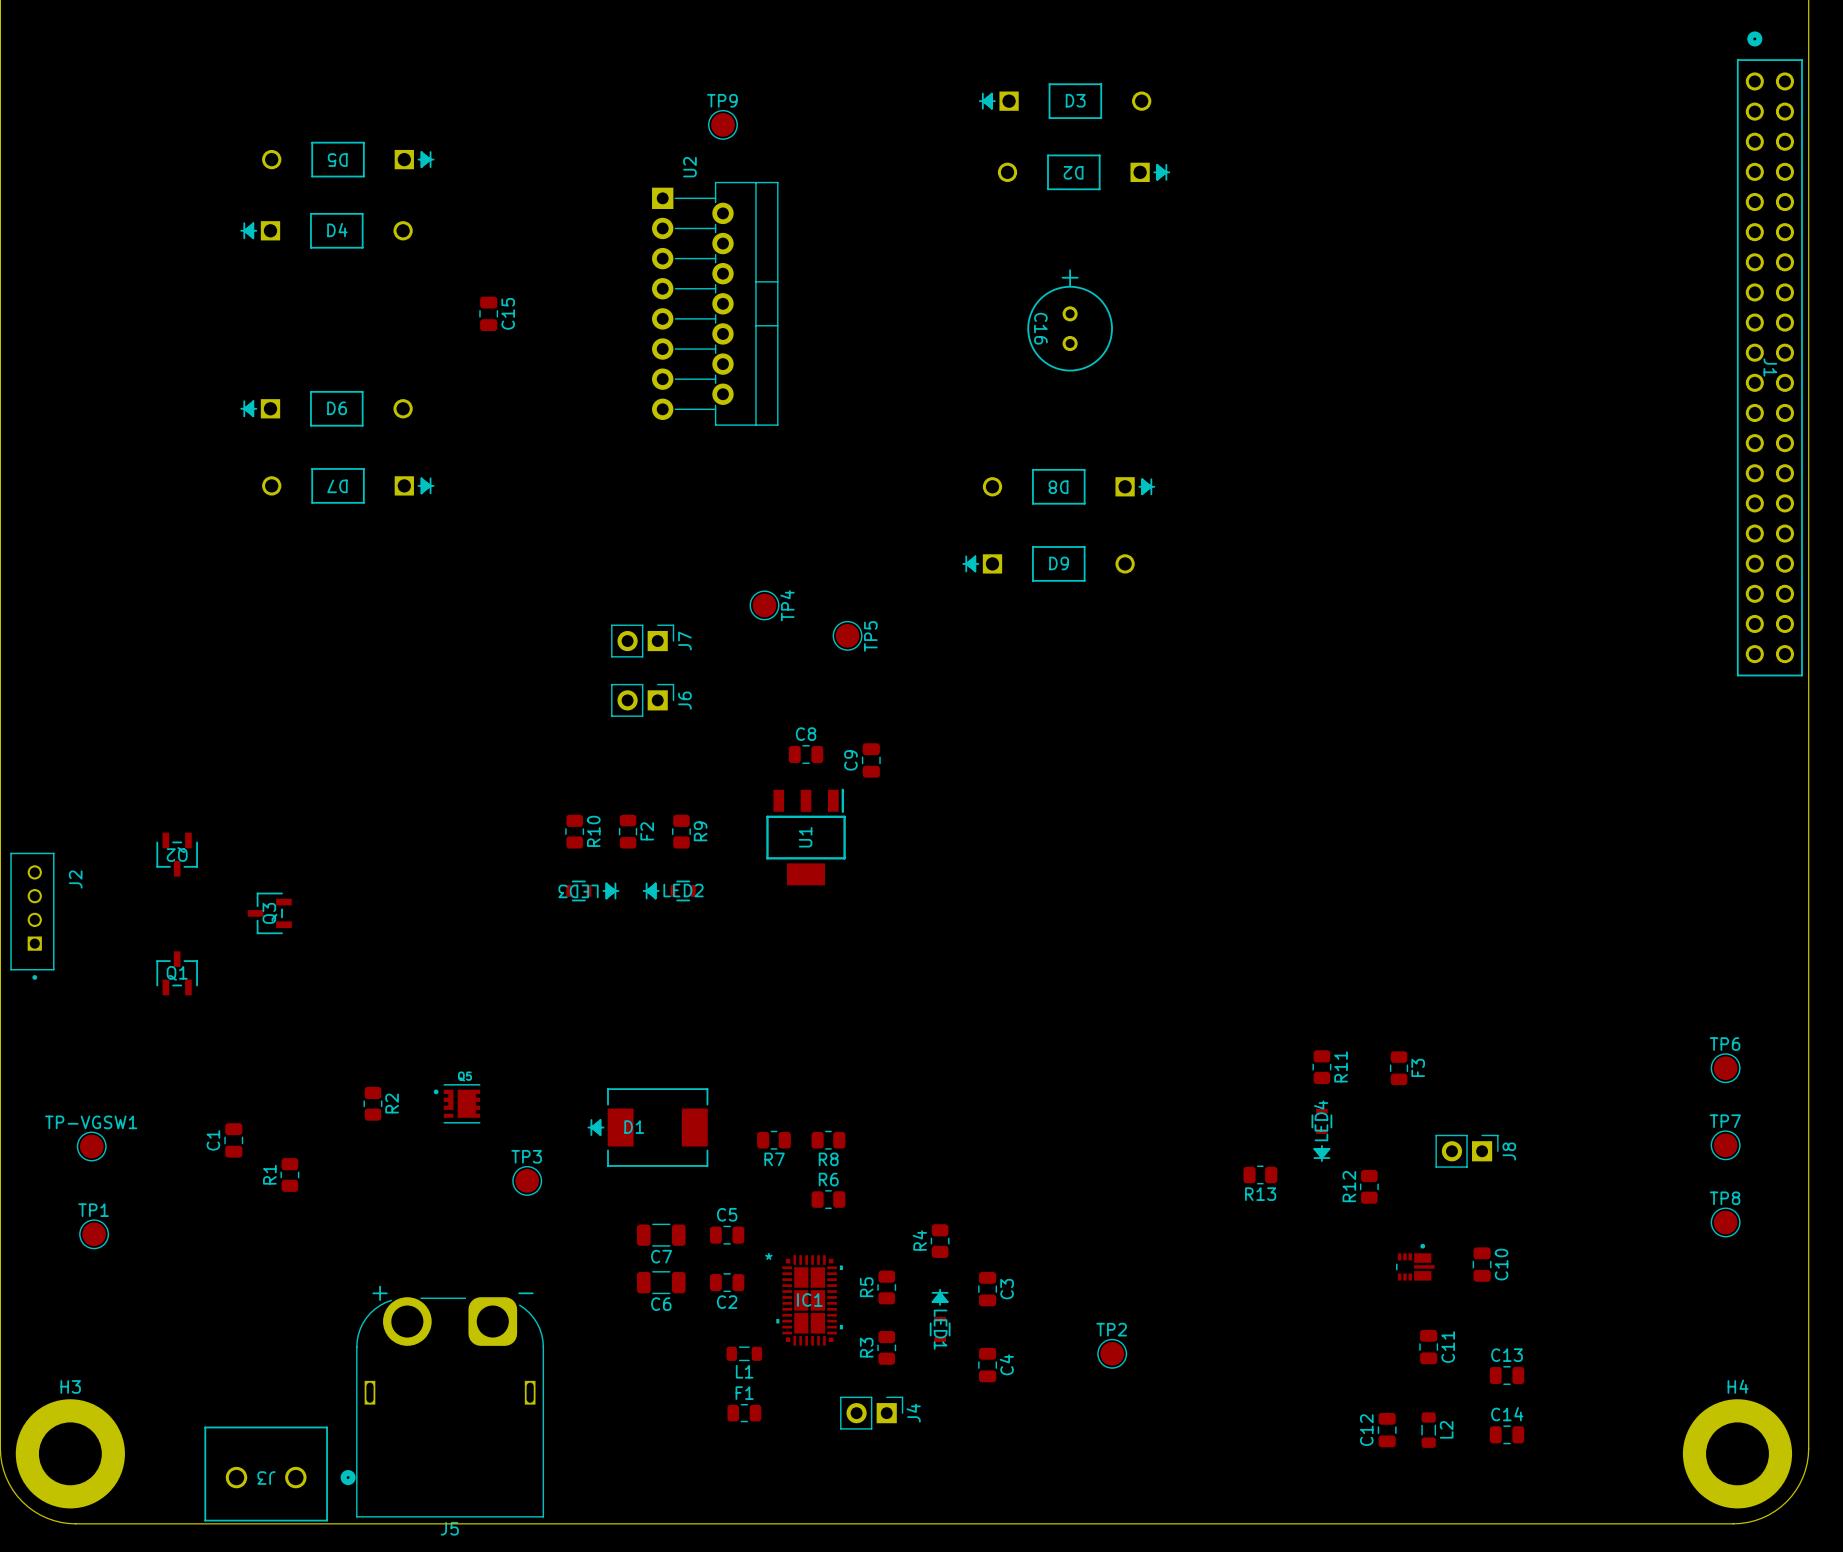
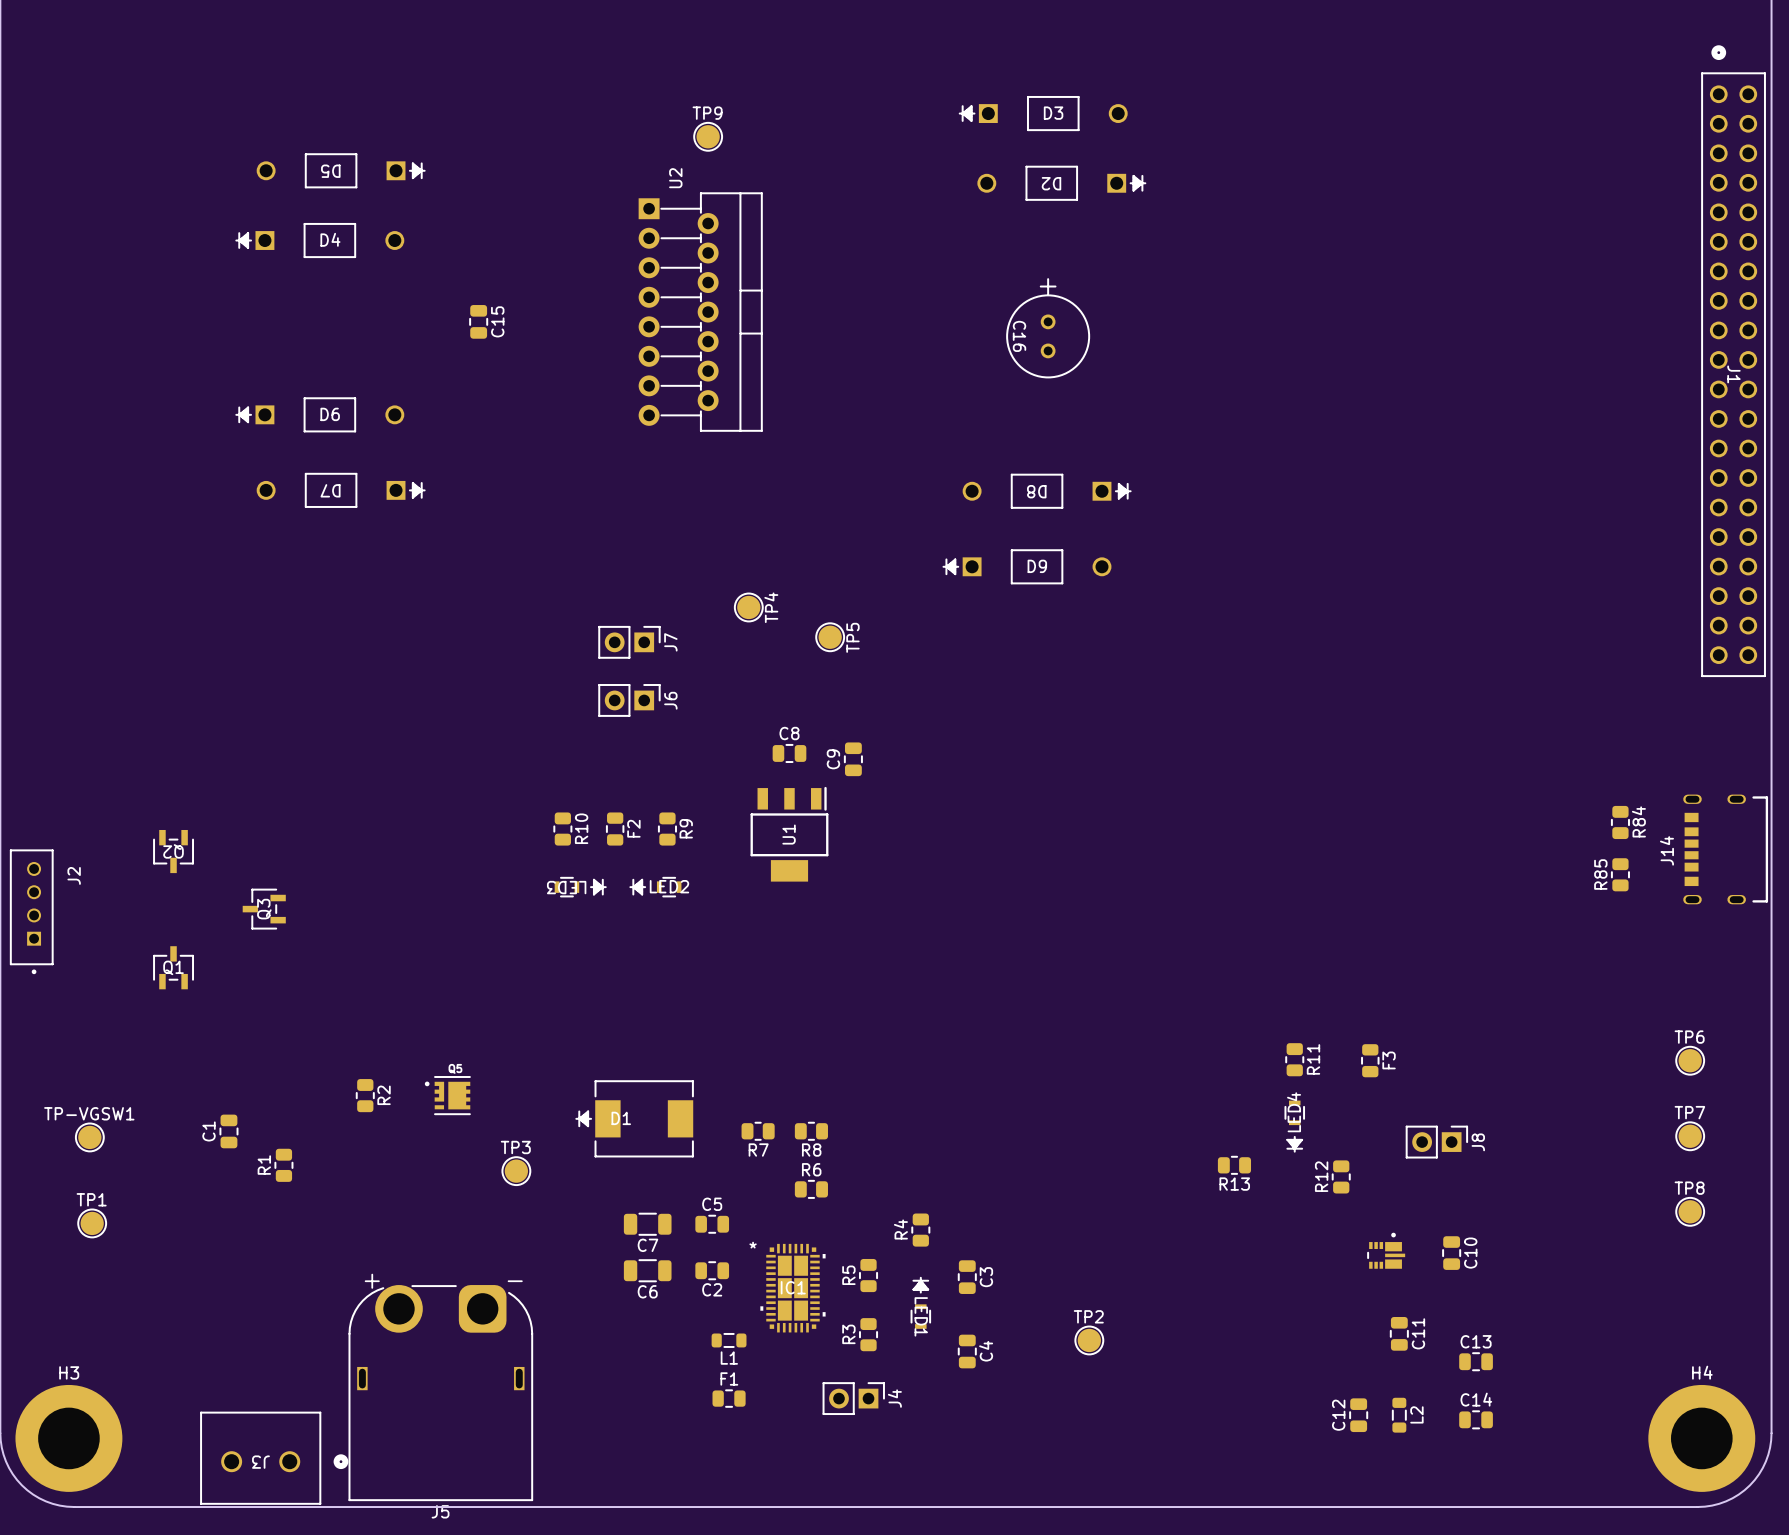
R84: none -> (1620, 822)
J14: none -> (1725, 849)
R85: none -> (1620, 874)

